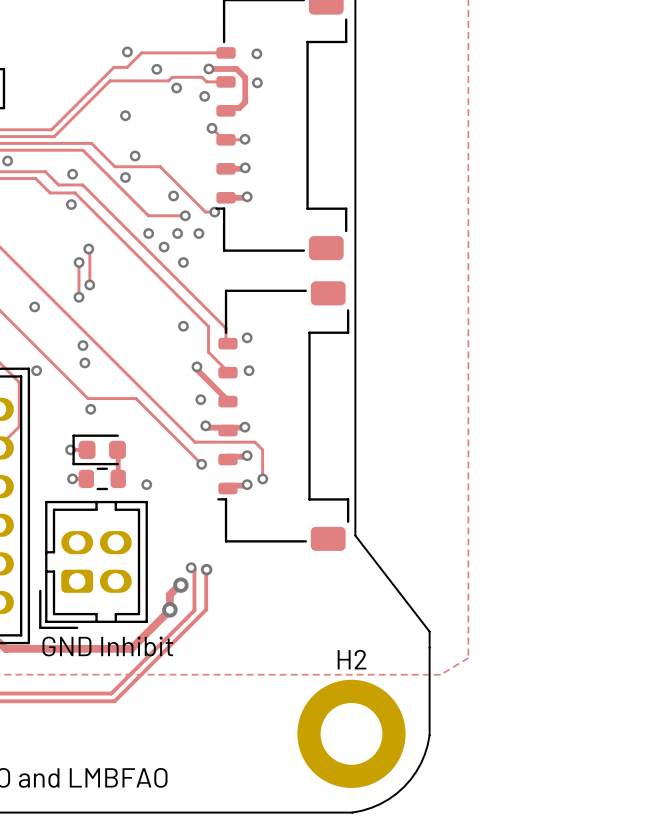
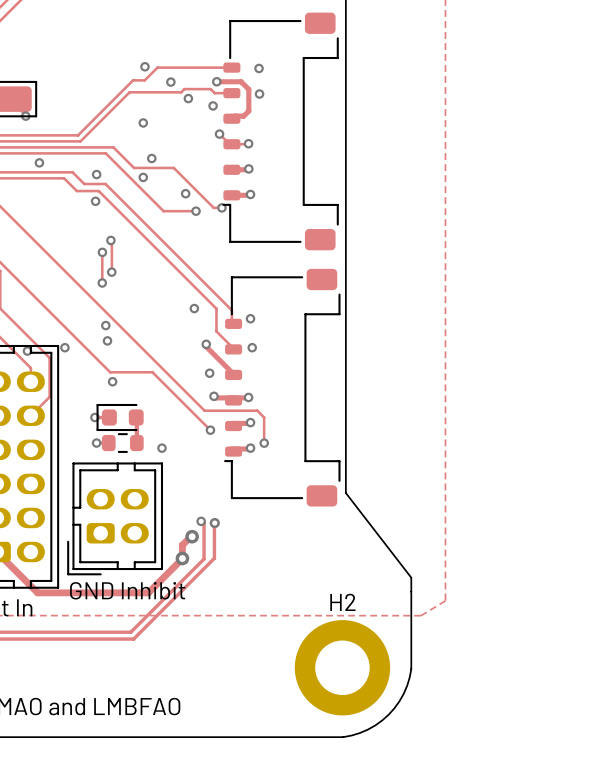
via: (148, 233) -> none
via: (177, 233) -> none
via: (198, 233) -> none
via: (164, 247) -> none
via: (183, 262) -> none
via: (34, 306) -> none

